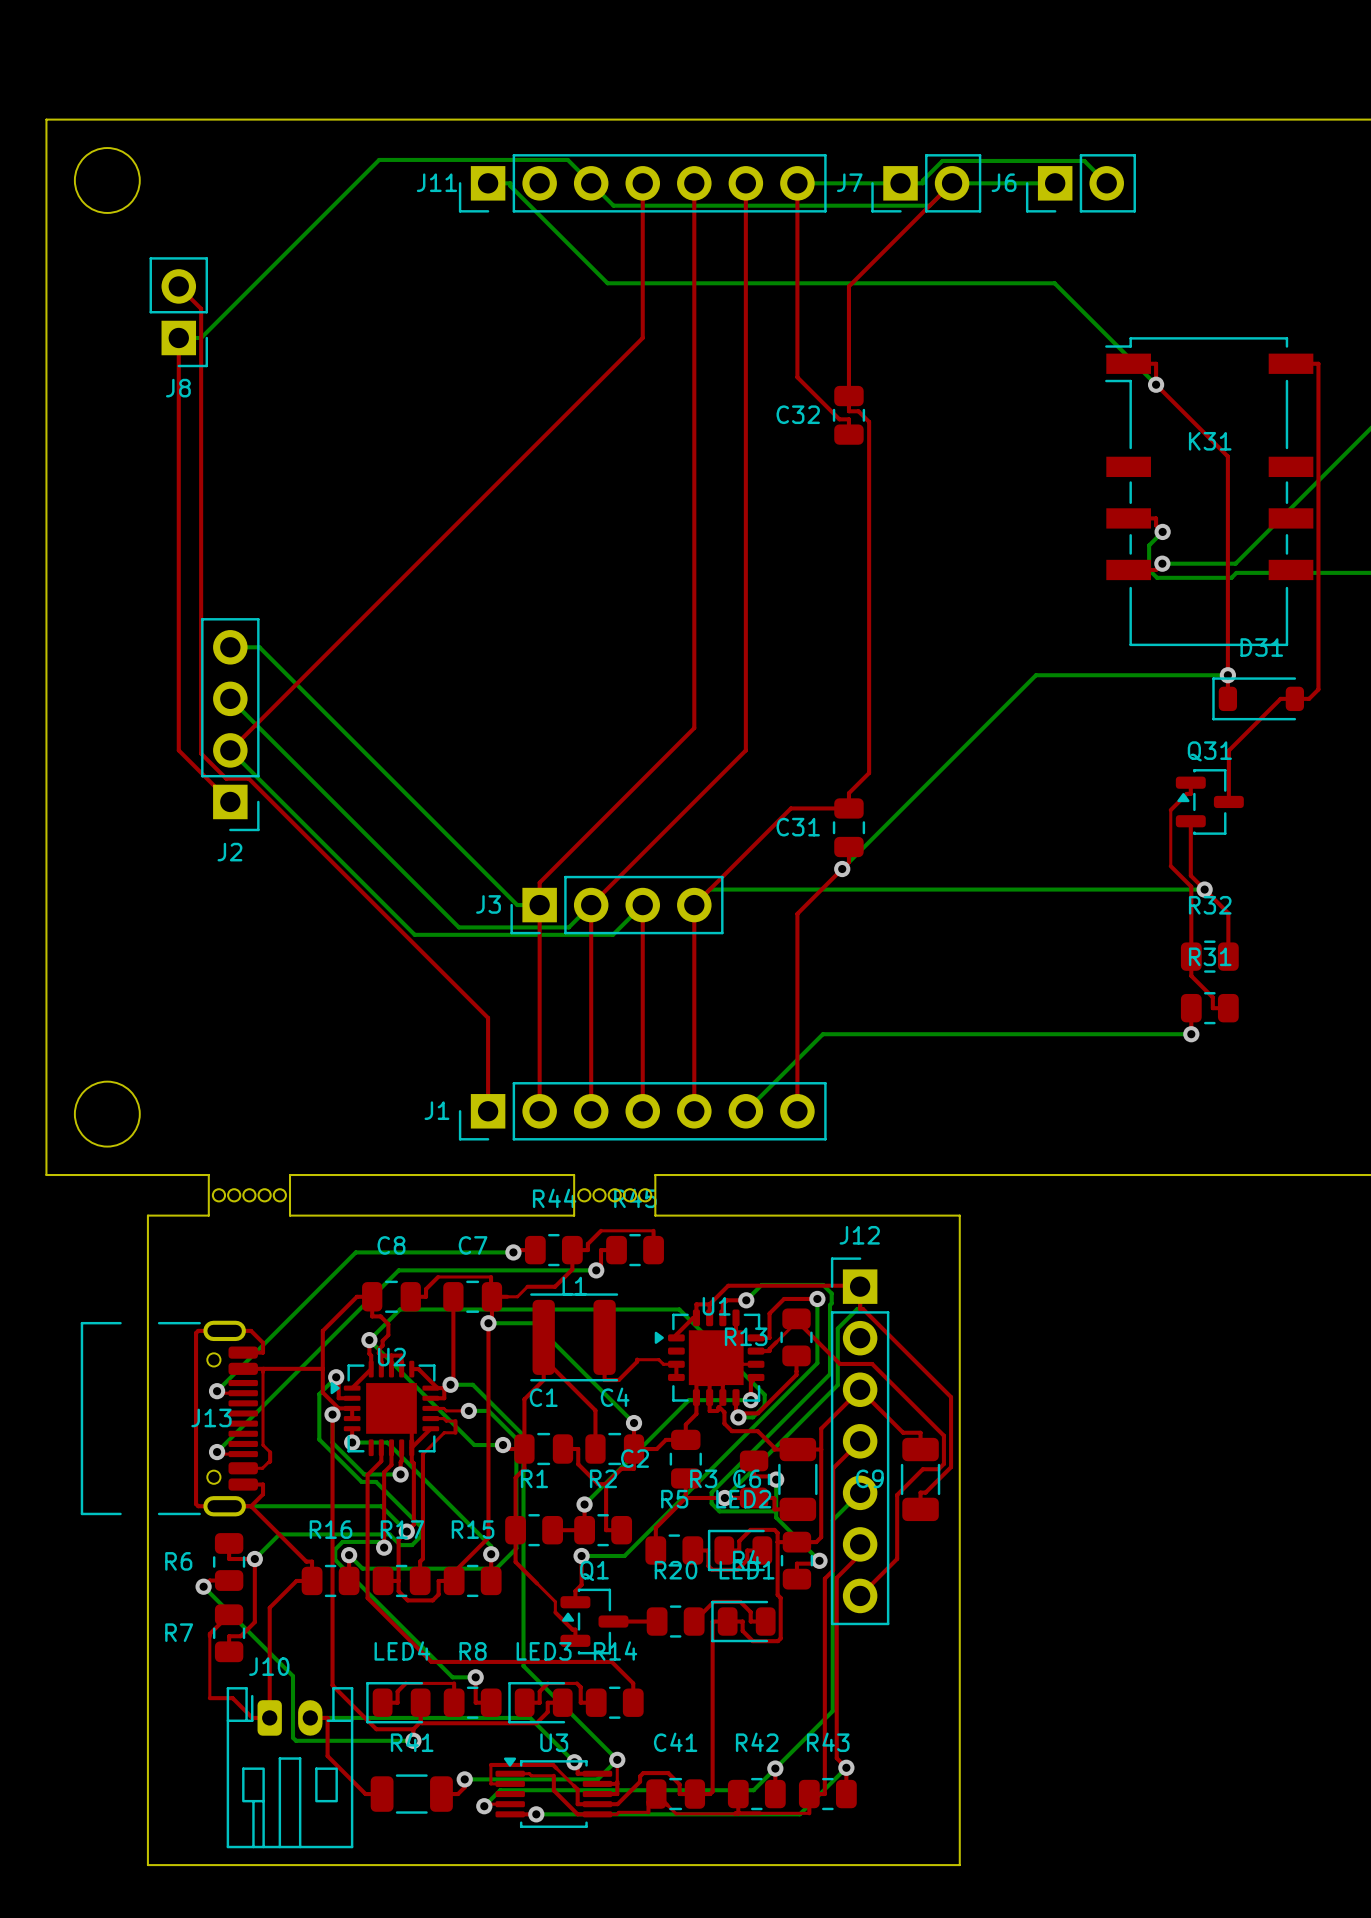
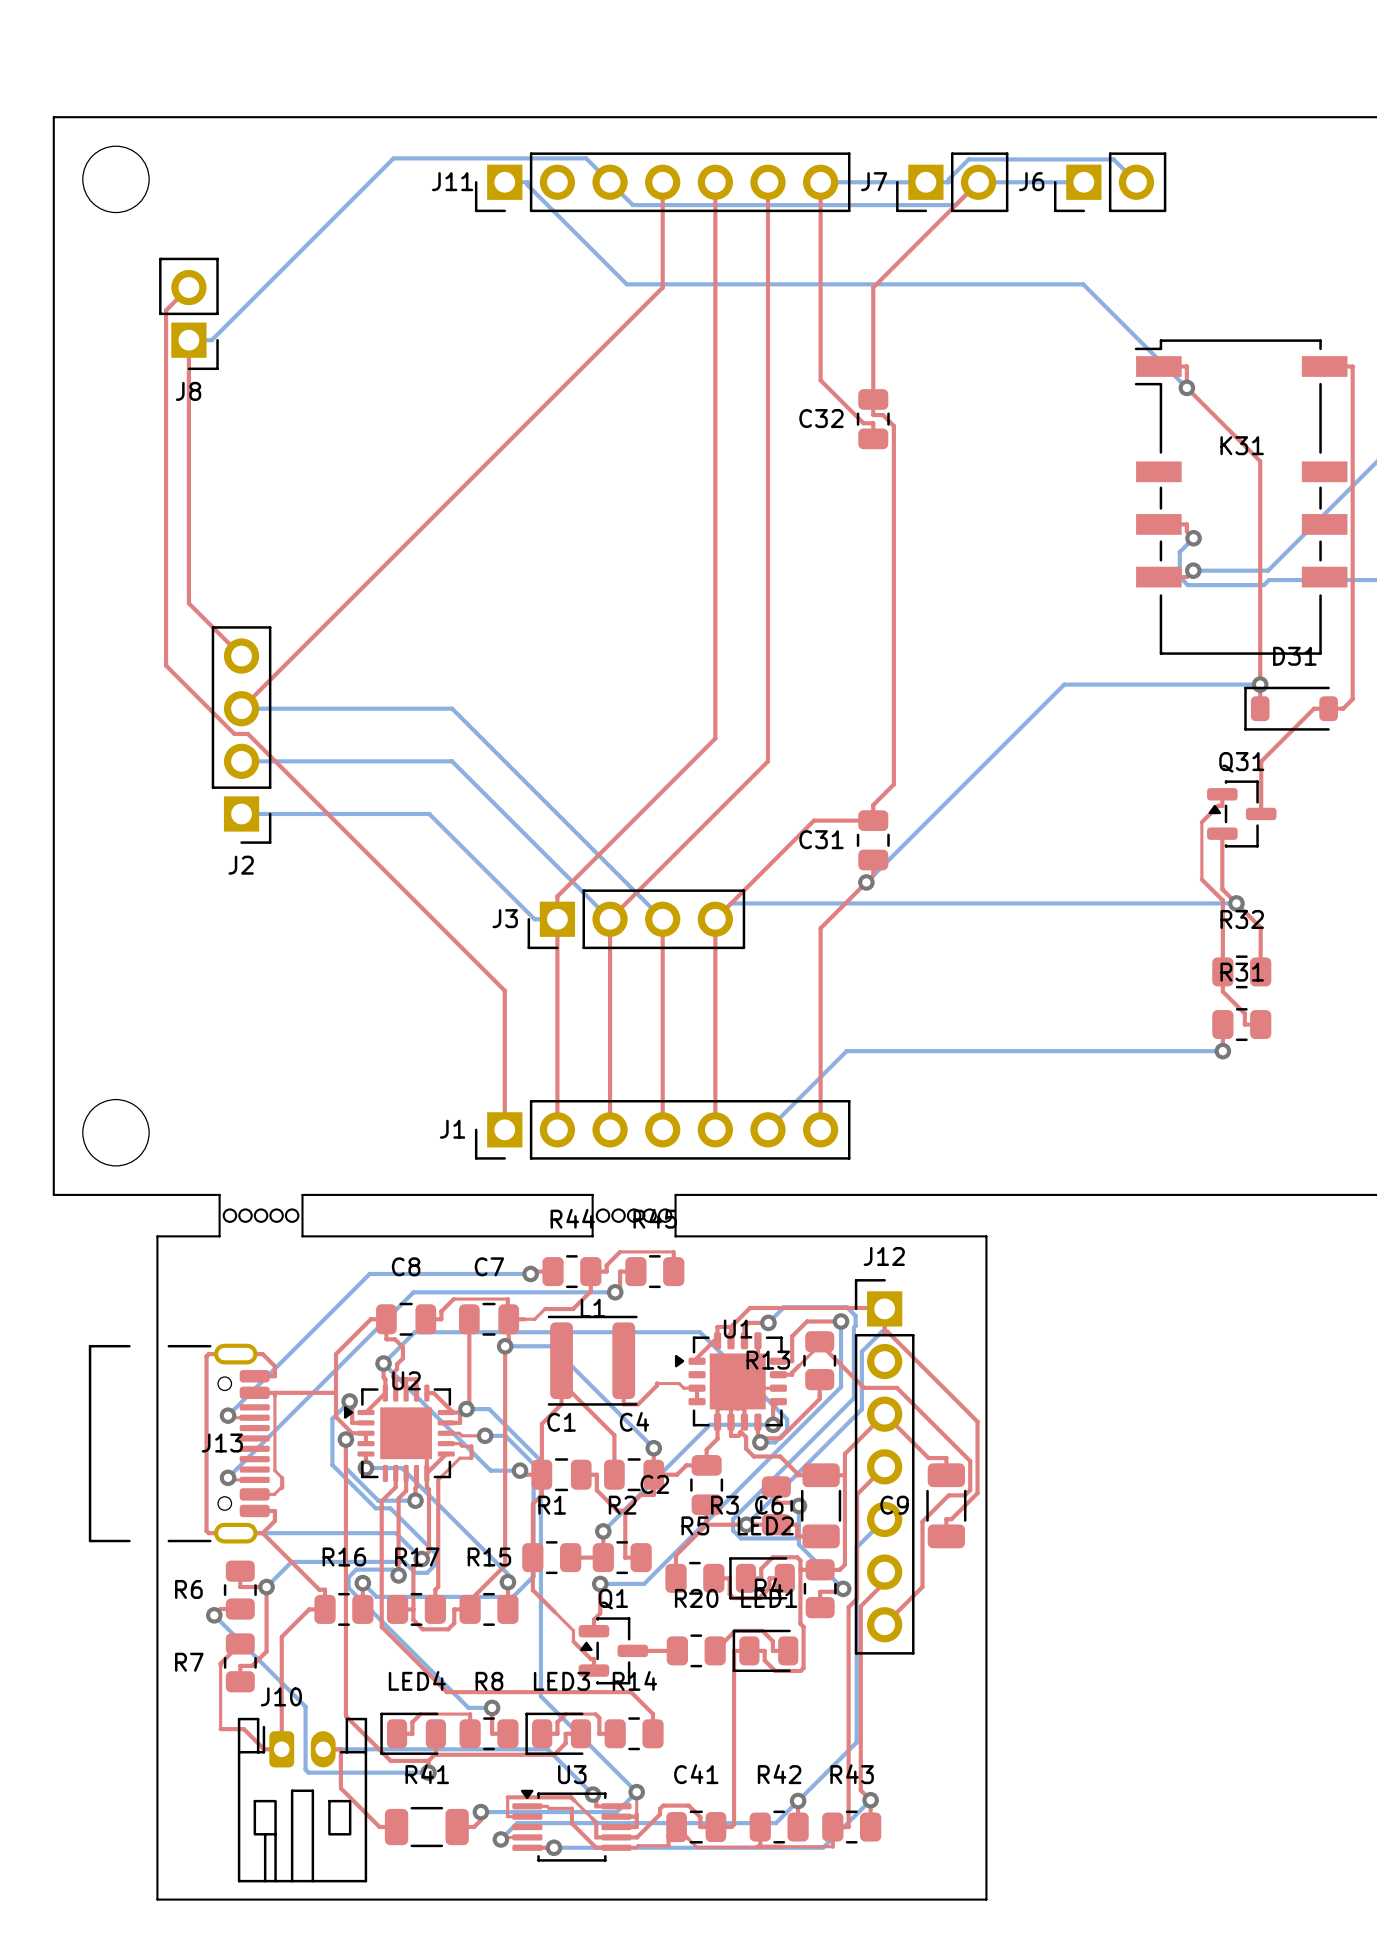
top track: (178, 286) (201, 308) (201, 753) (226, 778) (248, 778) (488, 1017) -> (188, 287) (166, 310) (166, 665) (234, 733) (247, 733) (504, 990) (504, 1034)
top track: (642, 286) (642, 337) (230, 750) -> (662, 287) (241, 708)
top track: (178, 595) (178, 750) (230, 801) -> (188, 603) (241, 656)
bottom track: (230, 647) (259, 647) (414, 801) -> (241, 813) (429, 813)
bottom track: (230, 698) (458, 927) (568, 927) (591, 905) -> (241, 708) (452, 708) (662, 919)
bottom track: (230, 750) (414, 934) (612, 934) (642, 905) -> (241, 761) (452, 761) (610, 919)

